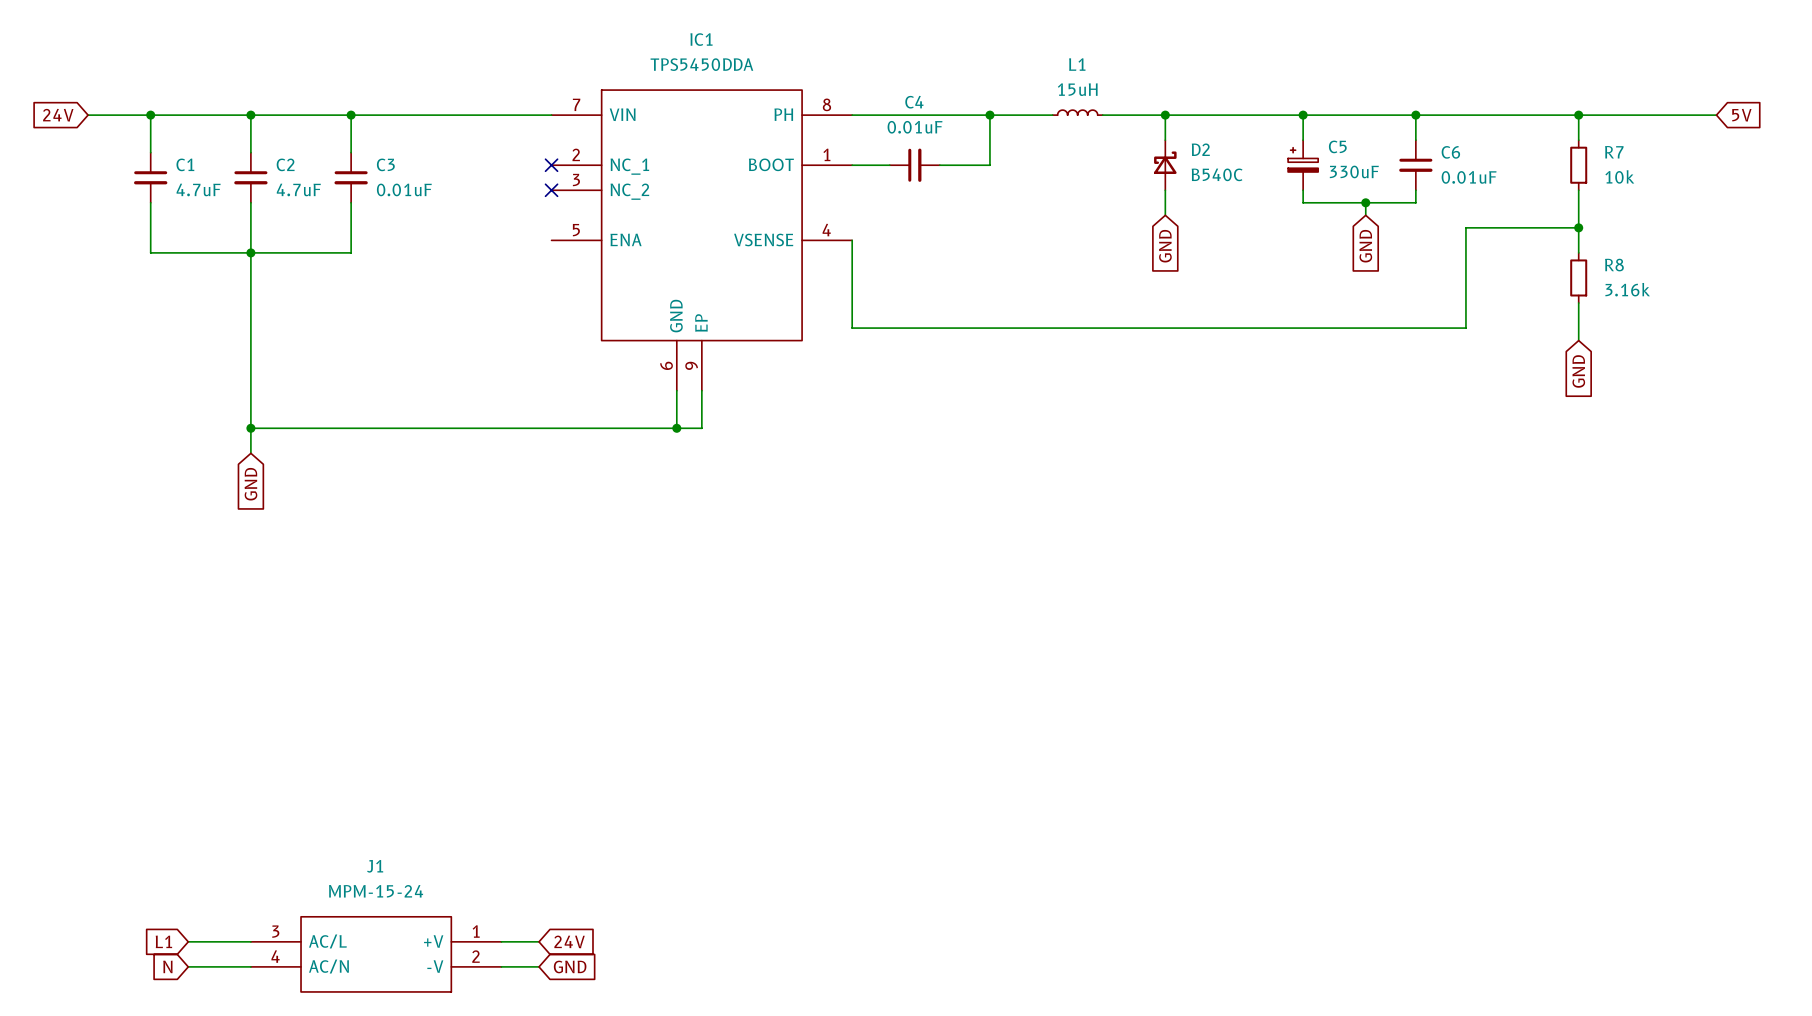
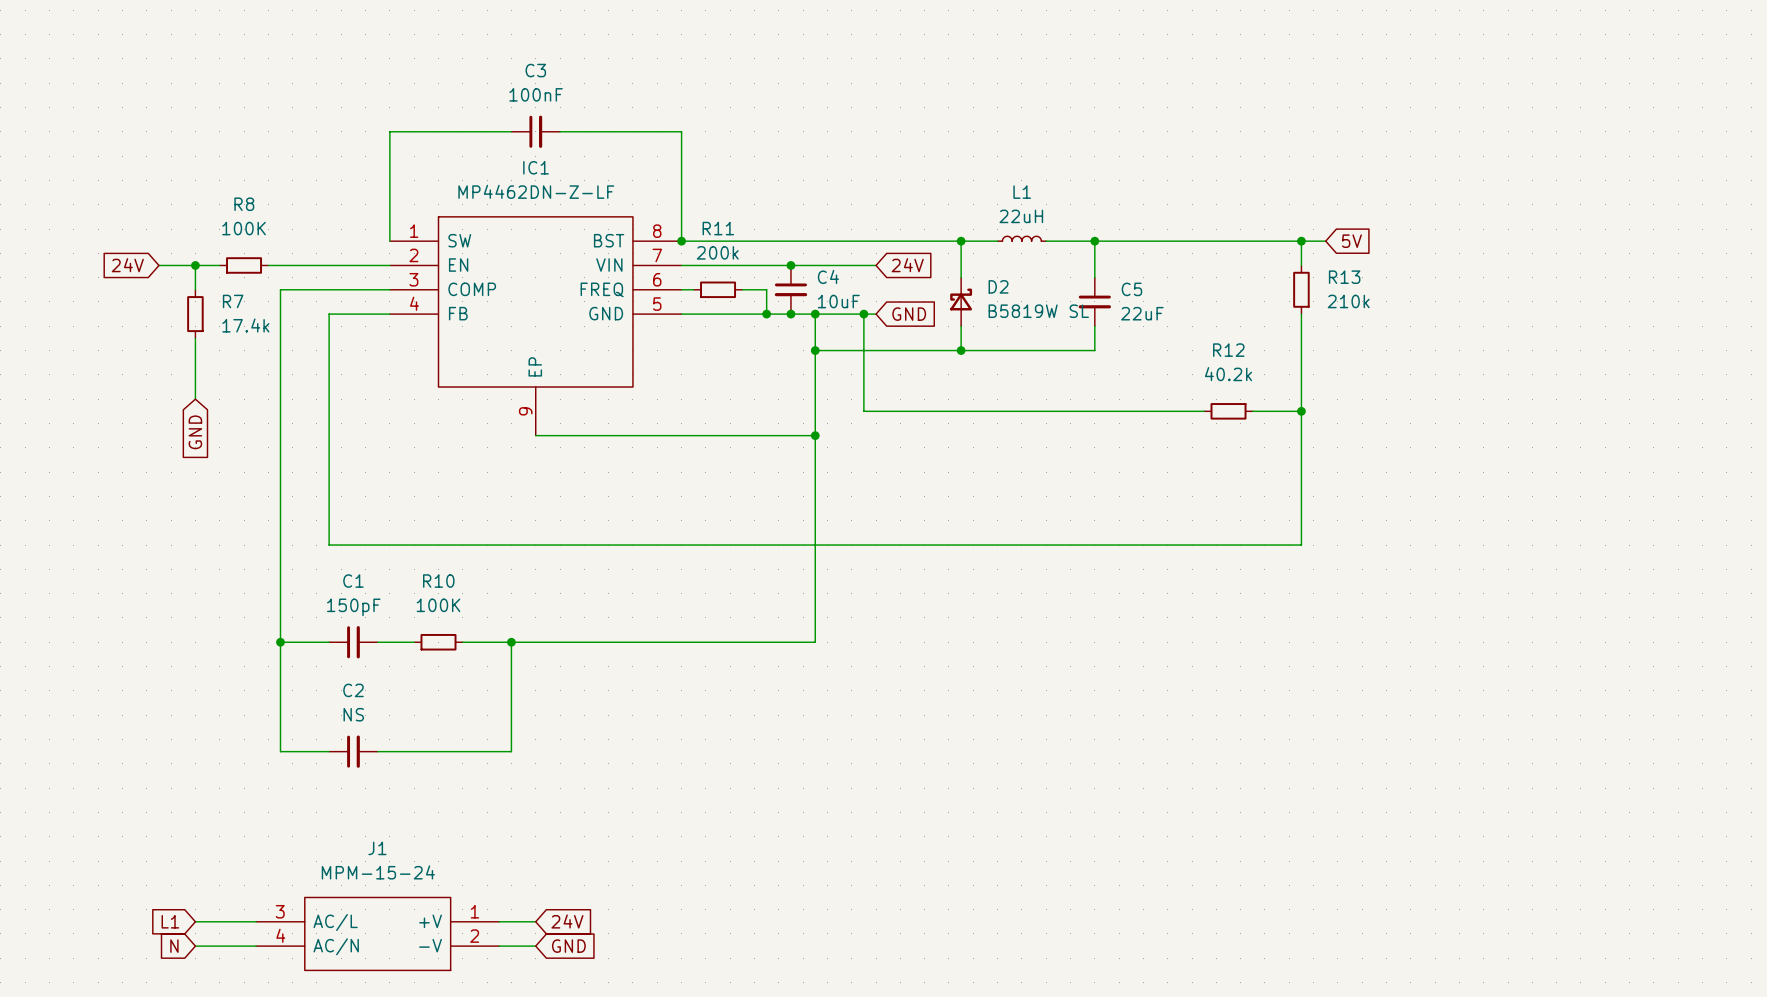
IC1 name position: IC1 (701, 39) -> IC1 (536, 167)
IC1 value: TPS5450DDA (701, 64) -> MP4462DN-Z-LF (536, 191)
IC1 symbol: [551, 89, 853, 391] -> [389, 216, 682, 436]
L1 value: 15uH (1077, 89) -> 22uH (1021, 216)
C4 name position: C4 (914, 102) -> C4 (828, 276)
L1 position: (1077, 112) -> (1021, 238)
global label position: 24V (58, 115) -> 24V (127, 265)
wire: (88, 115) (551, 115) -> none
wire: (150, 115) (150, 152) -> none
junction: (150, 115) -> none
wire: (250, 115) (250, 152) -> none
junction: (250, 115) -> none
wire: (351, 115) (351, 152) -> none
junction: (351, 115) -> none
wire: (852, 115) (1052, 115) -> (681, 265) (876, 265)
wire: (989, 115) (989, 165) (939, 165) -> none
junction: (989, 115) -> none
wire: (1102, 115) (1716, 115) -> none
wire: (1165, 115) (1165, 140) -> none
junction: (1165, 115) -> none
wire: (1303, 115) (1303, 140) -> (1301, 241) (1301, 265)
junction: (1303, 115) -> none
wire: (1415, 115) (1415, 140) -> none
junction: (1415, 115) -> none
wire: (1578, 115) (1578, 140) -> none
junction: (1578, 115) -> none
global label: 5V (1741, 115) -> none
wire: none -> (511, 131) (389, 131) (389, 241)
wire: none -> (560, 131) (681, 131) (681, 241) (997, 241)
C4 value: 0.01uF (915, 127) -> 10uF (838, 301)
C5 symbol: [1288, 140, 1319, 191] -> [1078, 277, 1111, 327]
C1 name position: C1 (185, 164) -> C1 (353, 581)
C2 name position: C2 (285, 164) -> C2 (353, 690)
C3 name position: C3 (385, 164) -> C3 (535, 70)
no-connect mark: (551, 165) -> none
wire: (852, 165) (889, 165) -> none
C4 rotation: 0° (914, 165) -> 90° clockwise (790, 289)
C4 position: (914, 165) -> (790, 289)
D2 position: (1165, 165) -> (961, 301)
C6: 0.01uF (1415, 165) -> none
R7 position: (1578, 165) -> (195, 314)
C5 value: 330uF (1354, 171) -> 22uF (1142, 313)
D2 value: B540C (1217, 174) -> B5819W SL (1038, 311)
R7 value: 10k (1619, 176) -> 17.4k (245, 325)
C1 rotation: 0° (150, 177) -> 90° counterclockwise (353, 642)
C1 position: (150, 177) -> (353, 642)
C2 rotation: 0° (250, 177) -> 90° counterclockwise (353, 751)
C2 position: (250, 177) -> (353, 751)
C3 rotation: 0° (351, 177) -> 90° counterclockwise (535, 131)
C3 position: (351, 177) -> (535, 131)
C1 value: 4.7uF (198, 189) -> 150pF (353, 607)
C2 value: 4.7uF (298, 189) -> NS (353, 714)
C3 value: 0.01uF (404, 189) -> 100nF (536, 94)
no-connect mark: (551, 190) -> none
wire: (1165, 190) (1165, 215) -> (961, 326) (961, 350)
wire: (1303, 190) (1303, 202) (1415, 202) (1415, 190) -> none
wire: (1578, 190) (1578, 252) -> none
wire: (150, 202) (150, 252) (351, 252) (351, 202) -> none
wire: (250, 202) (250, 453) -> none
wire: (1365, 202) (1365, 215) -> none
junction position: (1365, 202) -> (1301, 241)
wire: (1578, 227) (1465, 227) (1465, 328) (852, 328) (852, 240) -> none
junction: (1578, 227) -> none
junction: none -> (681, 241)
wire: none -> (961, 241) (961, 277)
junction: none -> (961, 241)
wire: none -> (1046, 241) (1325, 241)
wire: none -> (1094, 241) (1094, 277)
junction: none -> (1094, 241)
global label: none -> 5V (1351, 241)
global label: GND (1165, 246) -> none
global label: GND (1365, 246) -> none
junction: (250, 252) -> none
wire: none -> (158, 265) (219, 265)
wire: none -> (195, 265) (195, 289)
junction: none -> (195, 265)
wire: none -> (268, 265) (389, 265)
junction: none -> (790, 265)
global label: none -> 24V (907, 265)
R8 name position: R8 (1614, 265) -> R8 (244, 204)
R8 rotation: 0° (1578, 277) -> 90° clockwise (244, 265)
R8 position: (1578, 277) -> (244, 265)
R8 value: 3.16k (1627, 289) -> 100K (244, 228)
wire: none -> (389, 289) (280, 289) (280, 751) (329, 751)
wire: none -> (681, 289) (693, 289)
R11: none -> 200k (718, 289)
wire: none -> (742, 289) (766, 289) (766, 314)
R13: none -> 210k (1301, 289)
wire: (1578, 303) (1578, 340) -> none
wire: none -> (389, 314) (329, 314) (329, 545) (1301, 545) (1301, 314)
wire: none -> (681, 314) (876, 314)
junction: none -> (766, 314)
junction: none -> (790, 314)
wire: none -> (815, 314) (815, 642) (462, 642)
junction: none -> (815, 314)
wire: none -> (863, 314) (863, 411) (1204, 411)
junction: none -> (863, 314)
global label: none -> GND (909, 314)
wire: none -> (1094, 326) (1094, 350) (815, 350)
wire: none -> (195, 338) (195, 399)
junction: none -> (815, 350)
junction: none -> (961, 350)
global label: GND (1578, 371) -> none
wire: (676, 390) (676, 428) -> none
wire: (701, 390) (701, 428) (250, 428) -> none
R12: none -> 40.2k (1228, 411)
wire: none -> (1252, 411) (1301, 411)
junction: none -> (1301, 411)
junction: (250, 428) -> none
junction: (676, 428) -> none
wire: none -> (535, 435) (815, 435)
junction: none -> (815, 435)
global label position: GND (250, 484) -> GND (195, 432)
wire: none -> (280, 642) (329, 642)
junction: none -> (280, 642)
wire: none -> (377, 642) (414, 642)
R10: none -> 100K (438, 642)
wire: none -> (511, 642) (511, 751) (377, 751)
junction: none -> (511, 642)

